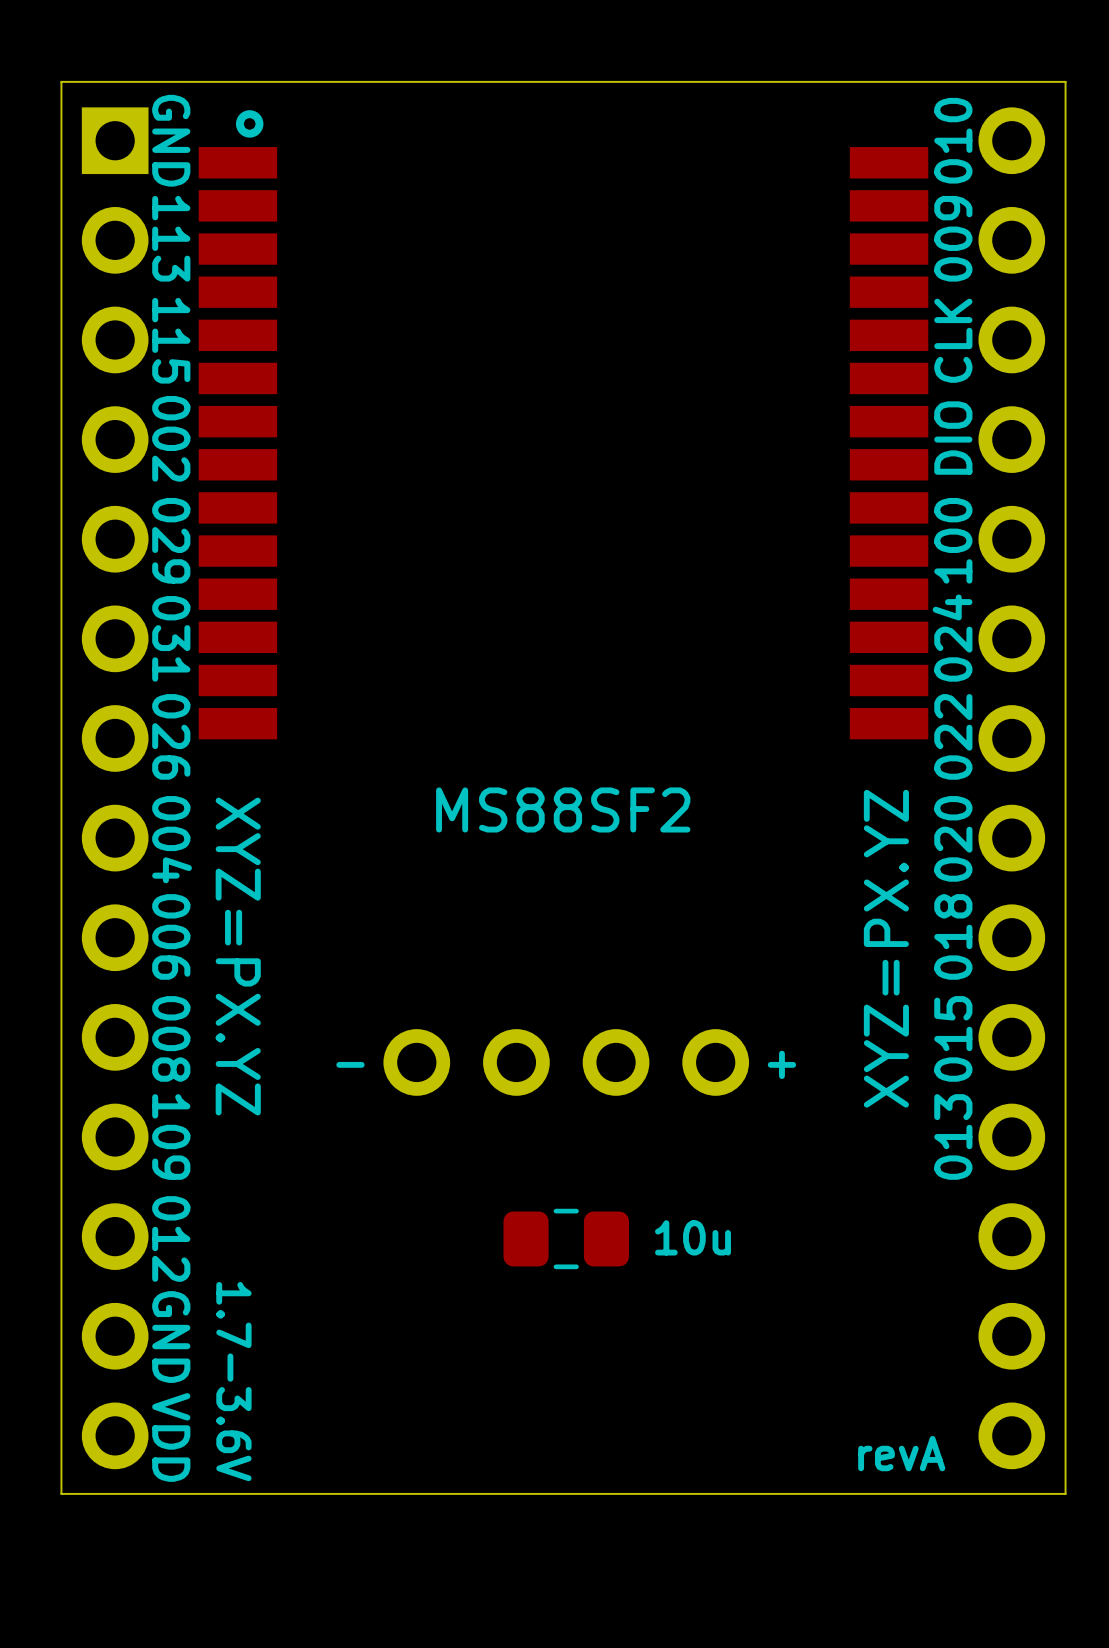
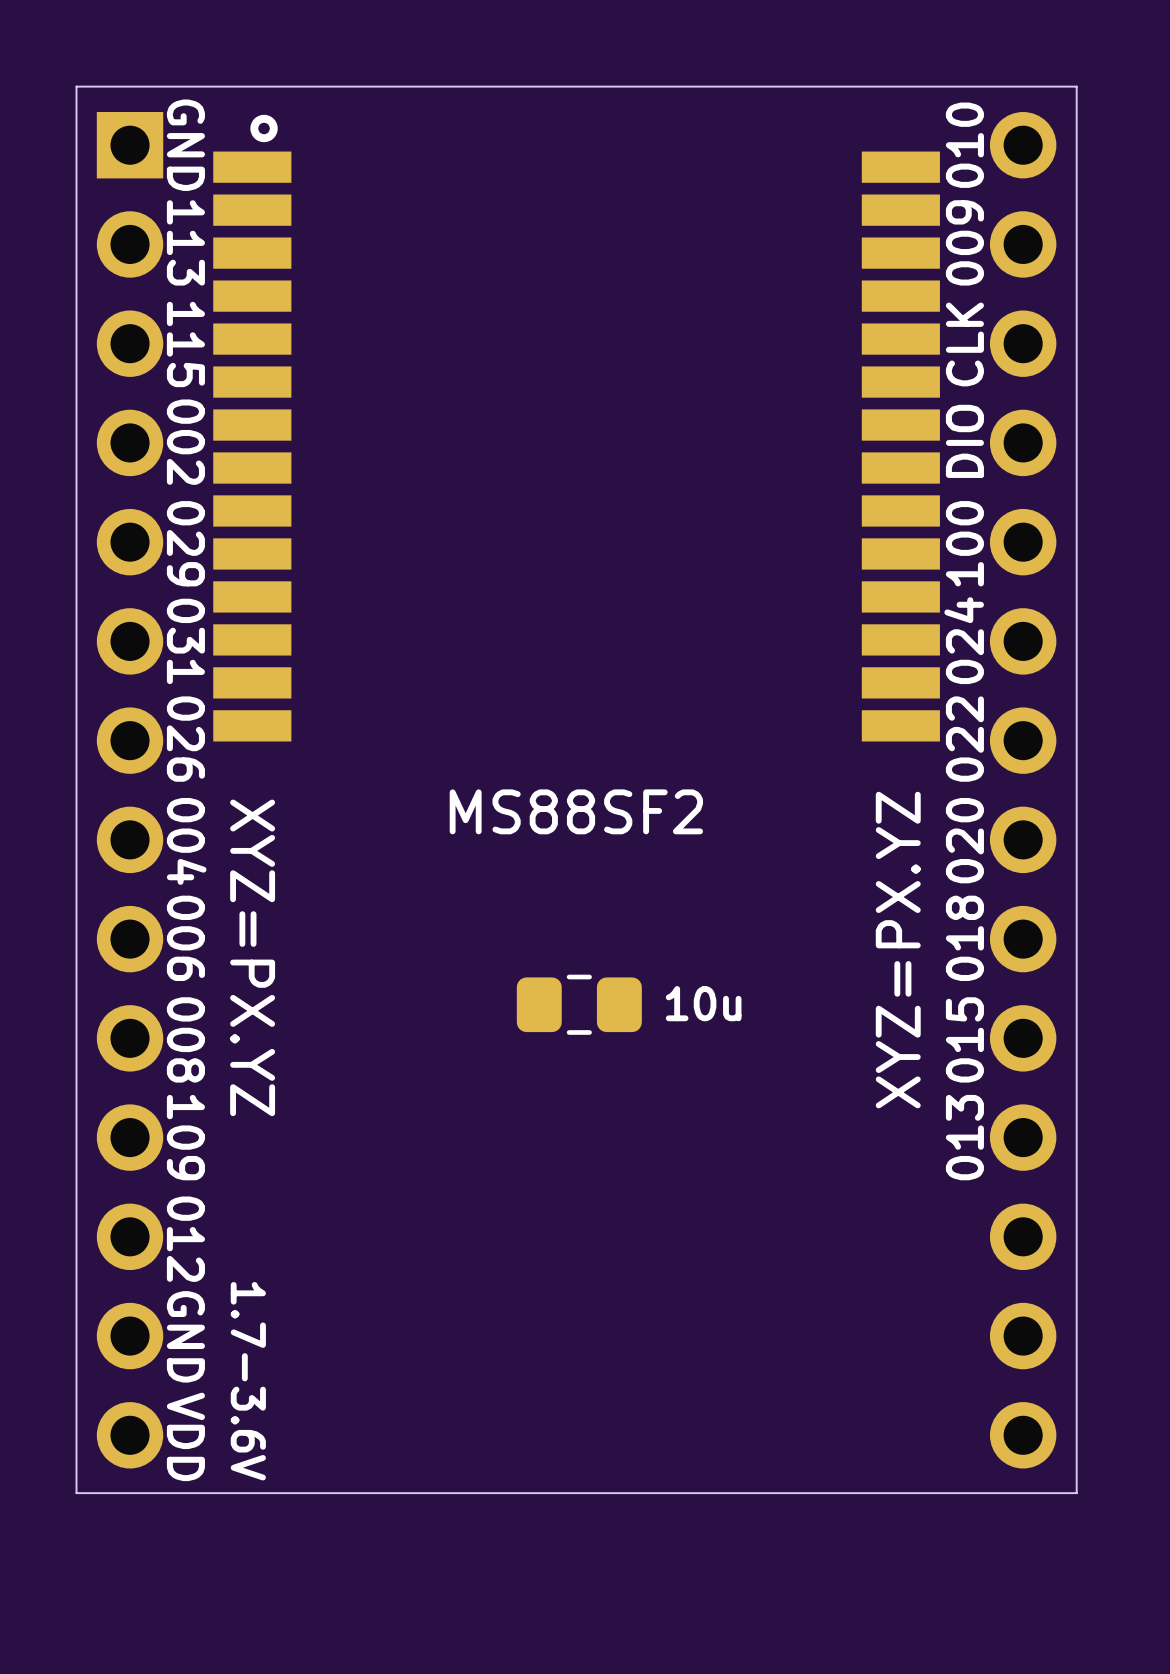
part: (566, 1062) -> none
text: - (350, 1064) -> none
text: + (781, 1064) -> none
text position: 10u (693, 1237) -> 10u (703, 1003)
part position: (566, 1238) -> (579, 1004)
text: revA (901, 1453) -> none

